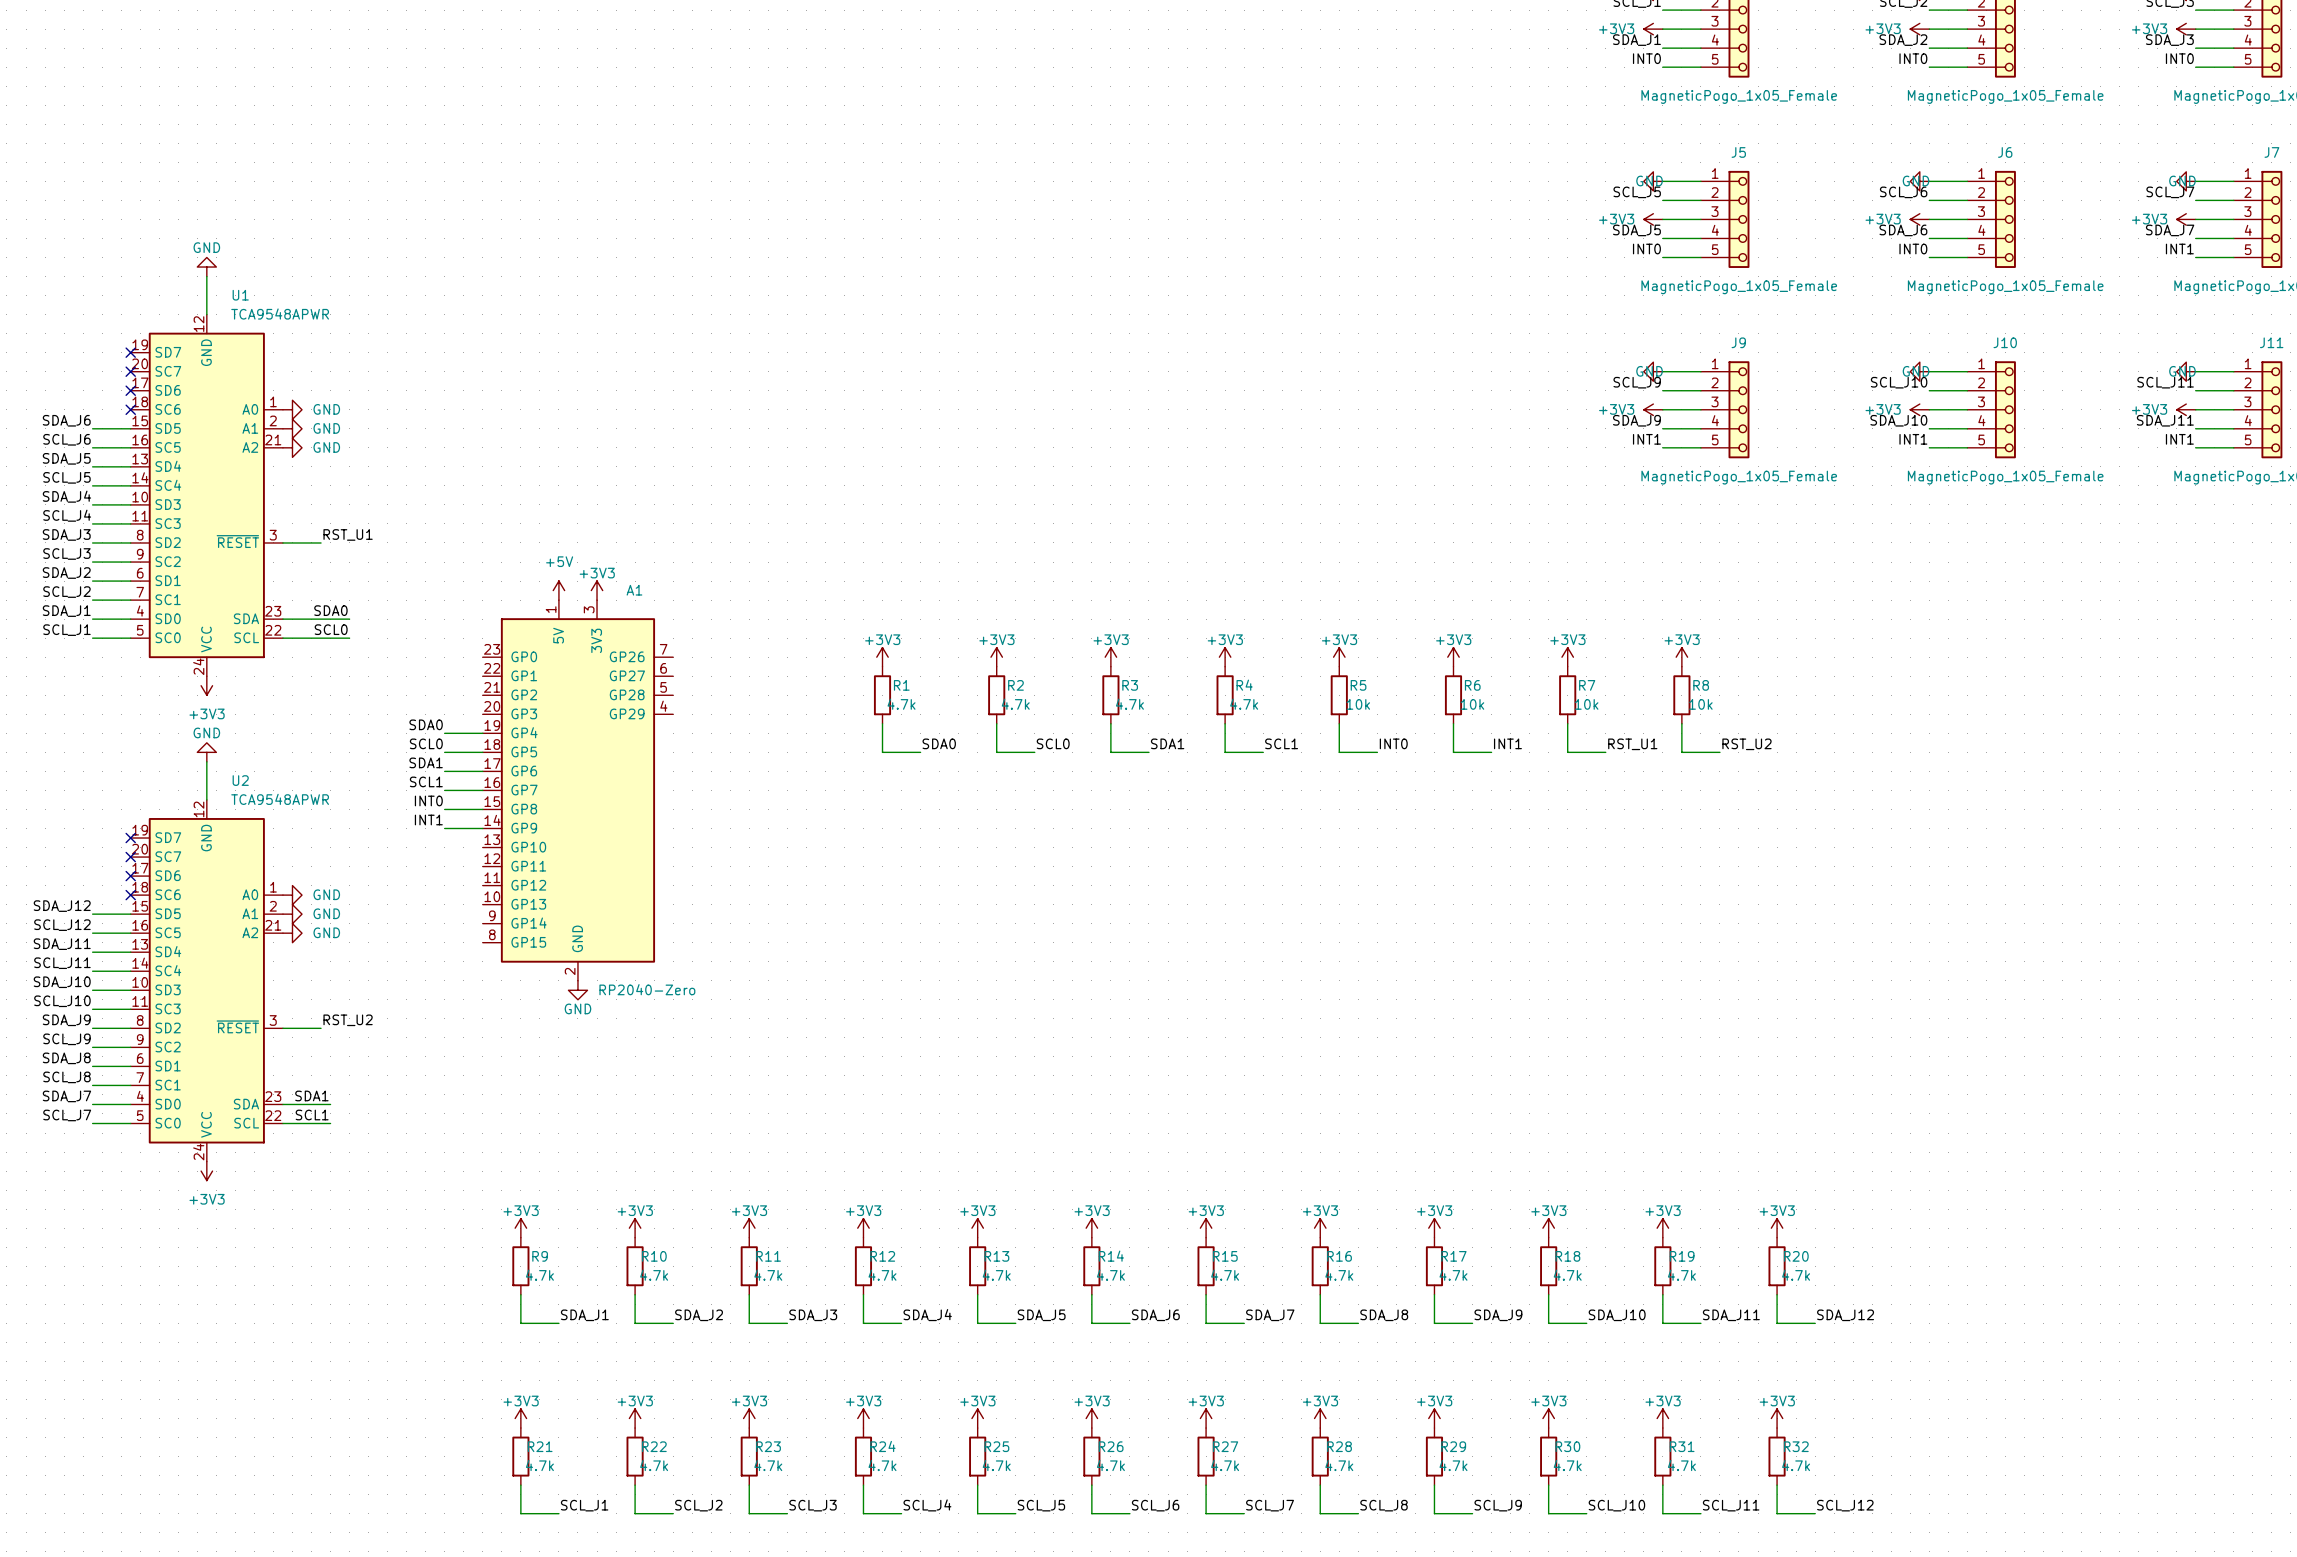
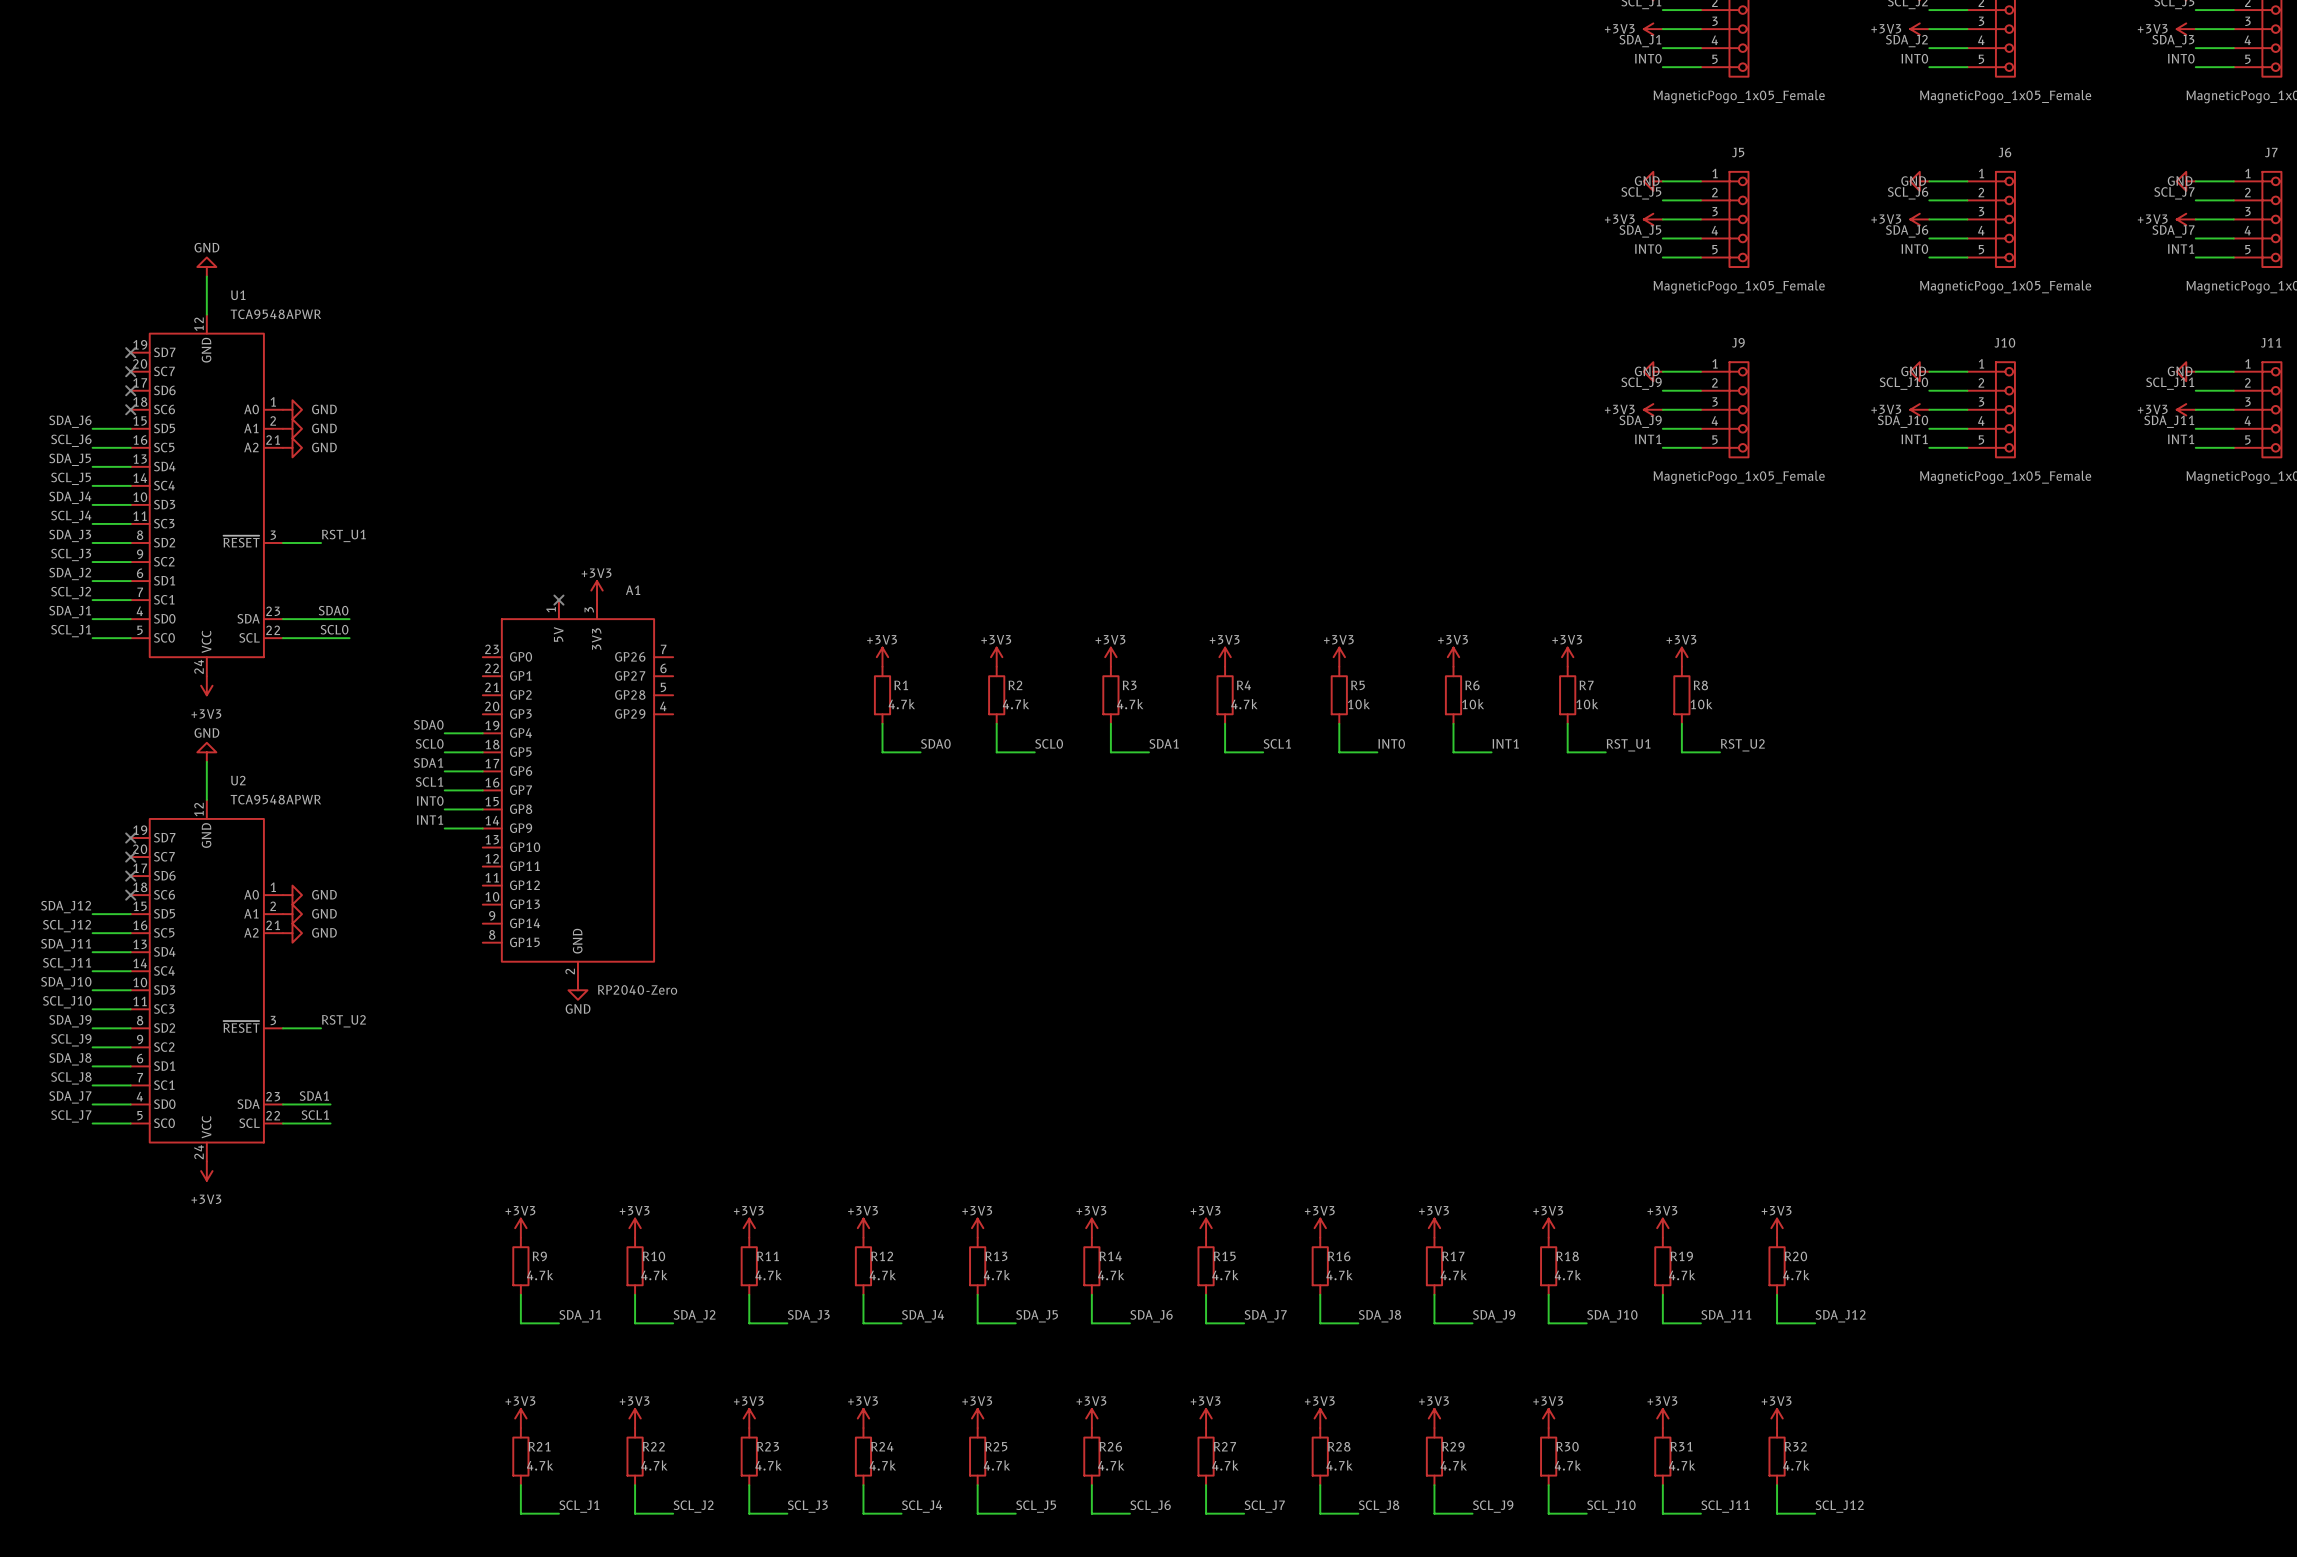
power symbol: +5V (558, 590) -> none
no-connect mark: none -> (558, 600)

